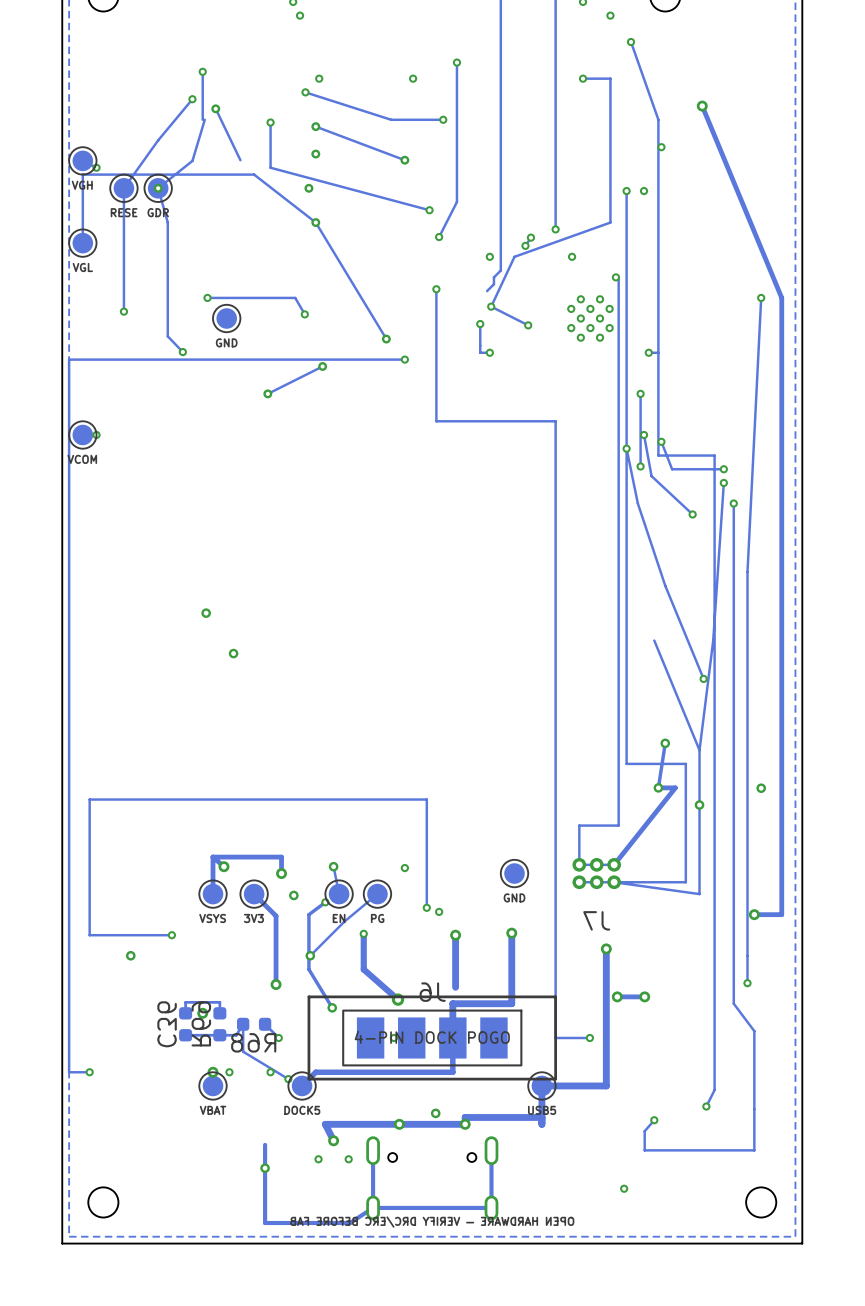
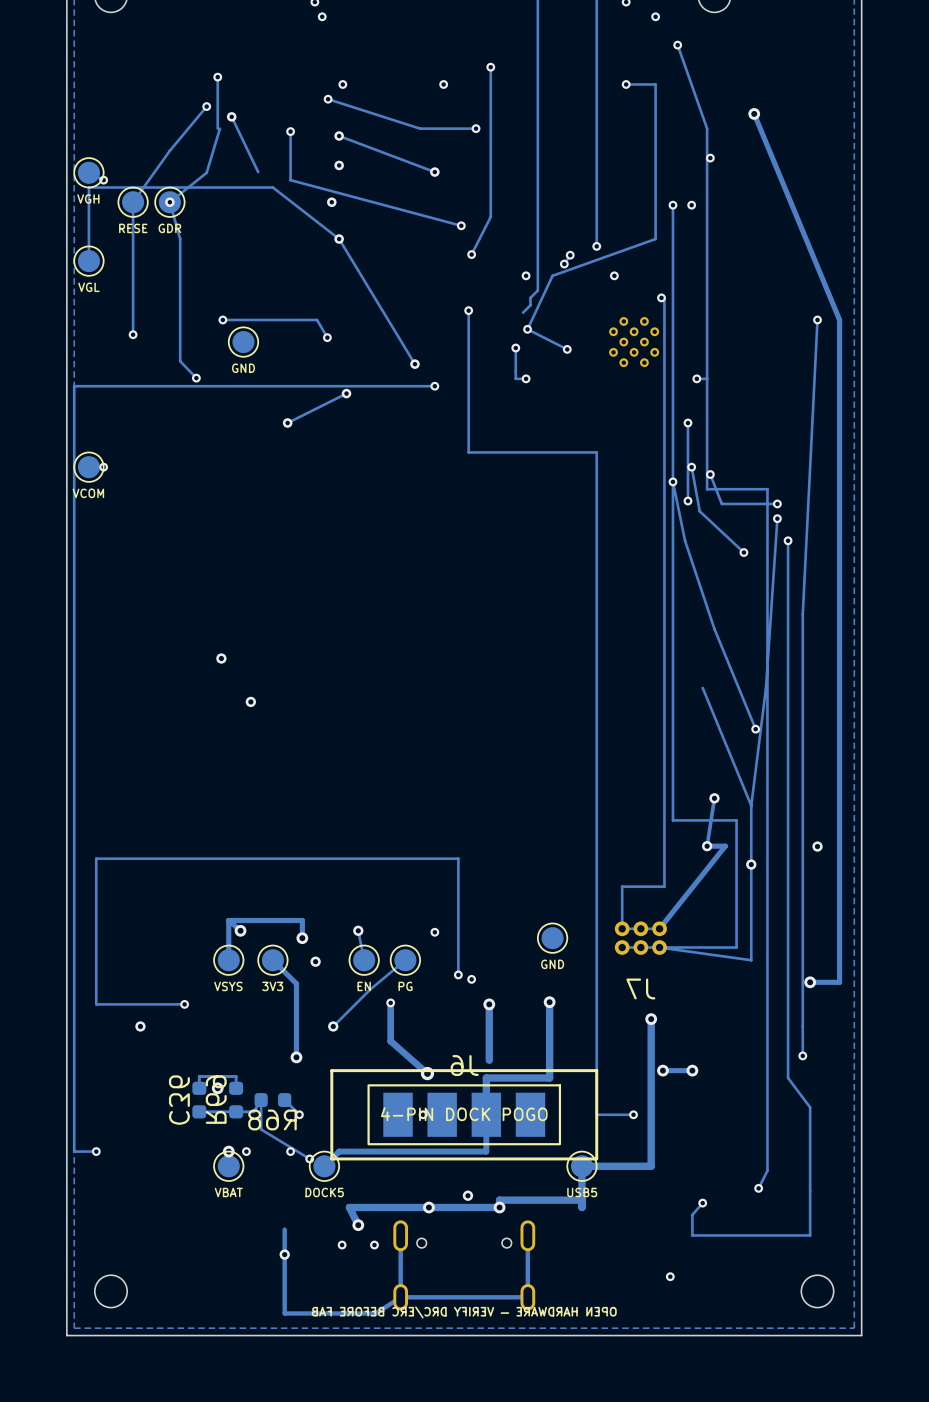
track: (325, 902) (308, 914) (308, 969) (332, 1007) -> none
via: (325, 902) -> none
via: (332, 1007) -> none

